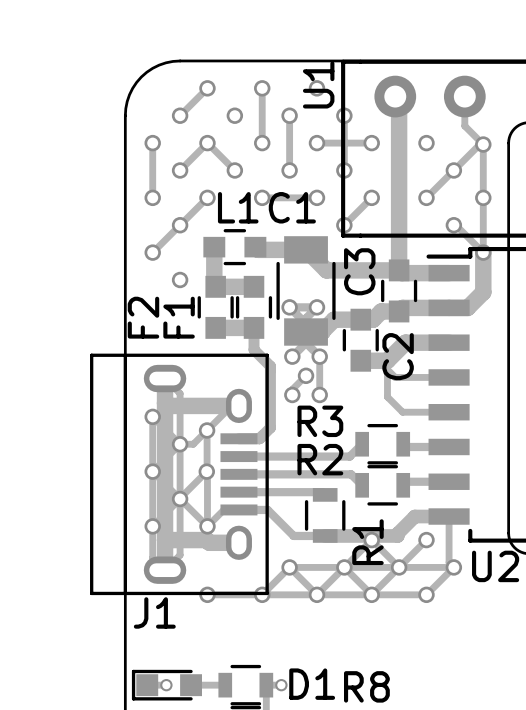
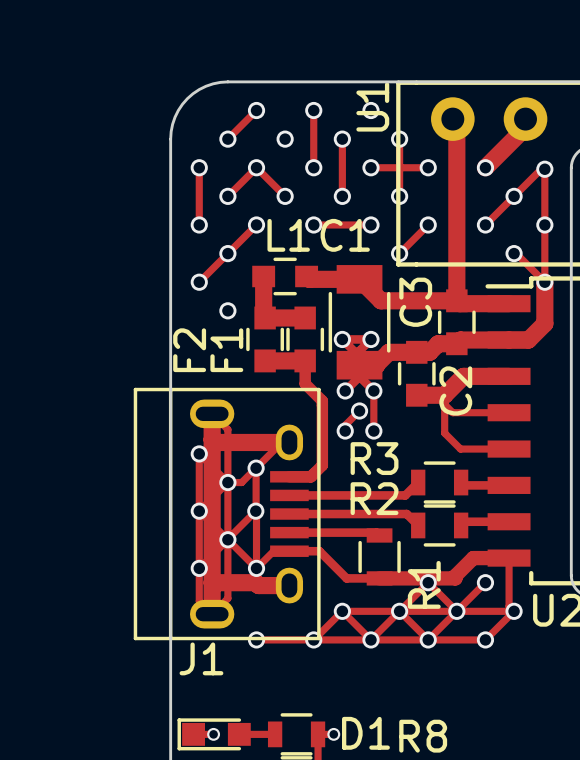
track: (464, 104) (464, 126) (483, 144) -> (525, 127) (485, 167)

